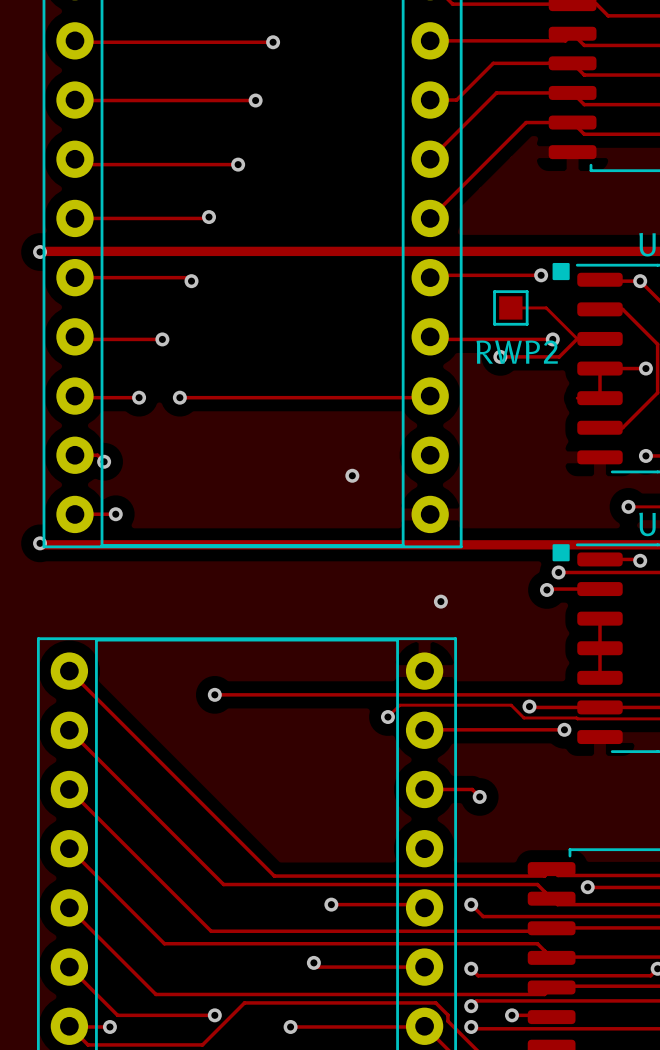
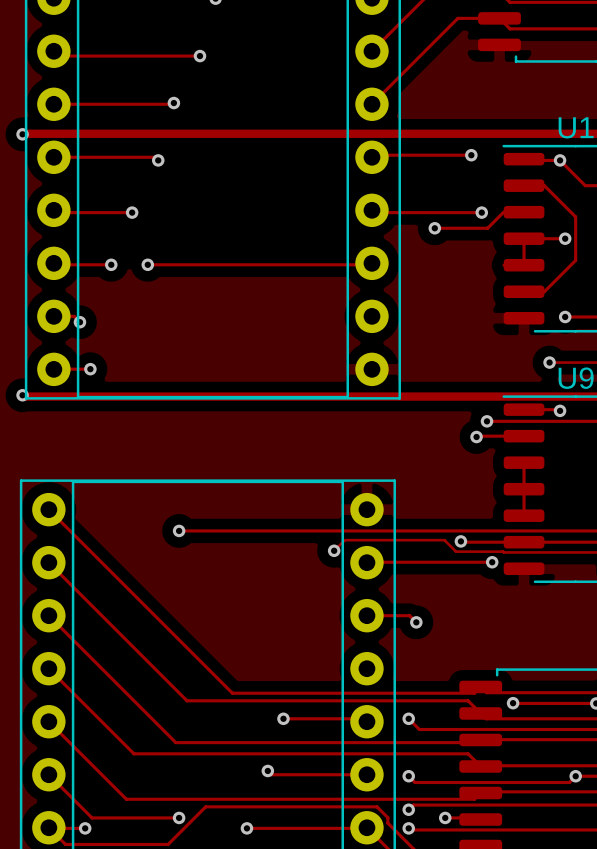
drawing: [552, 262, 570, 281] -> none
track: (510, 307) (546, 307) (577, 338) -> none
RWP2: (510, 307) -> none
via: (352, 475) -> none
drawing: [552, 544, 570, 562] -> none
via: (440, 601) -> none

